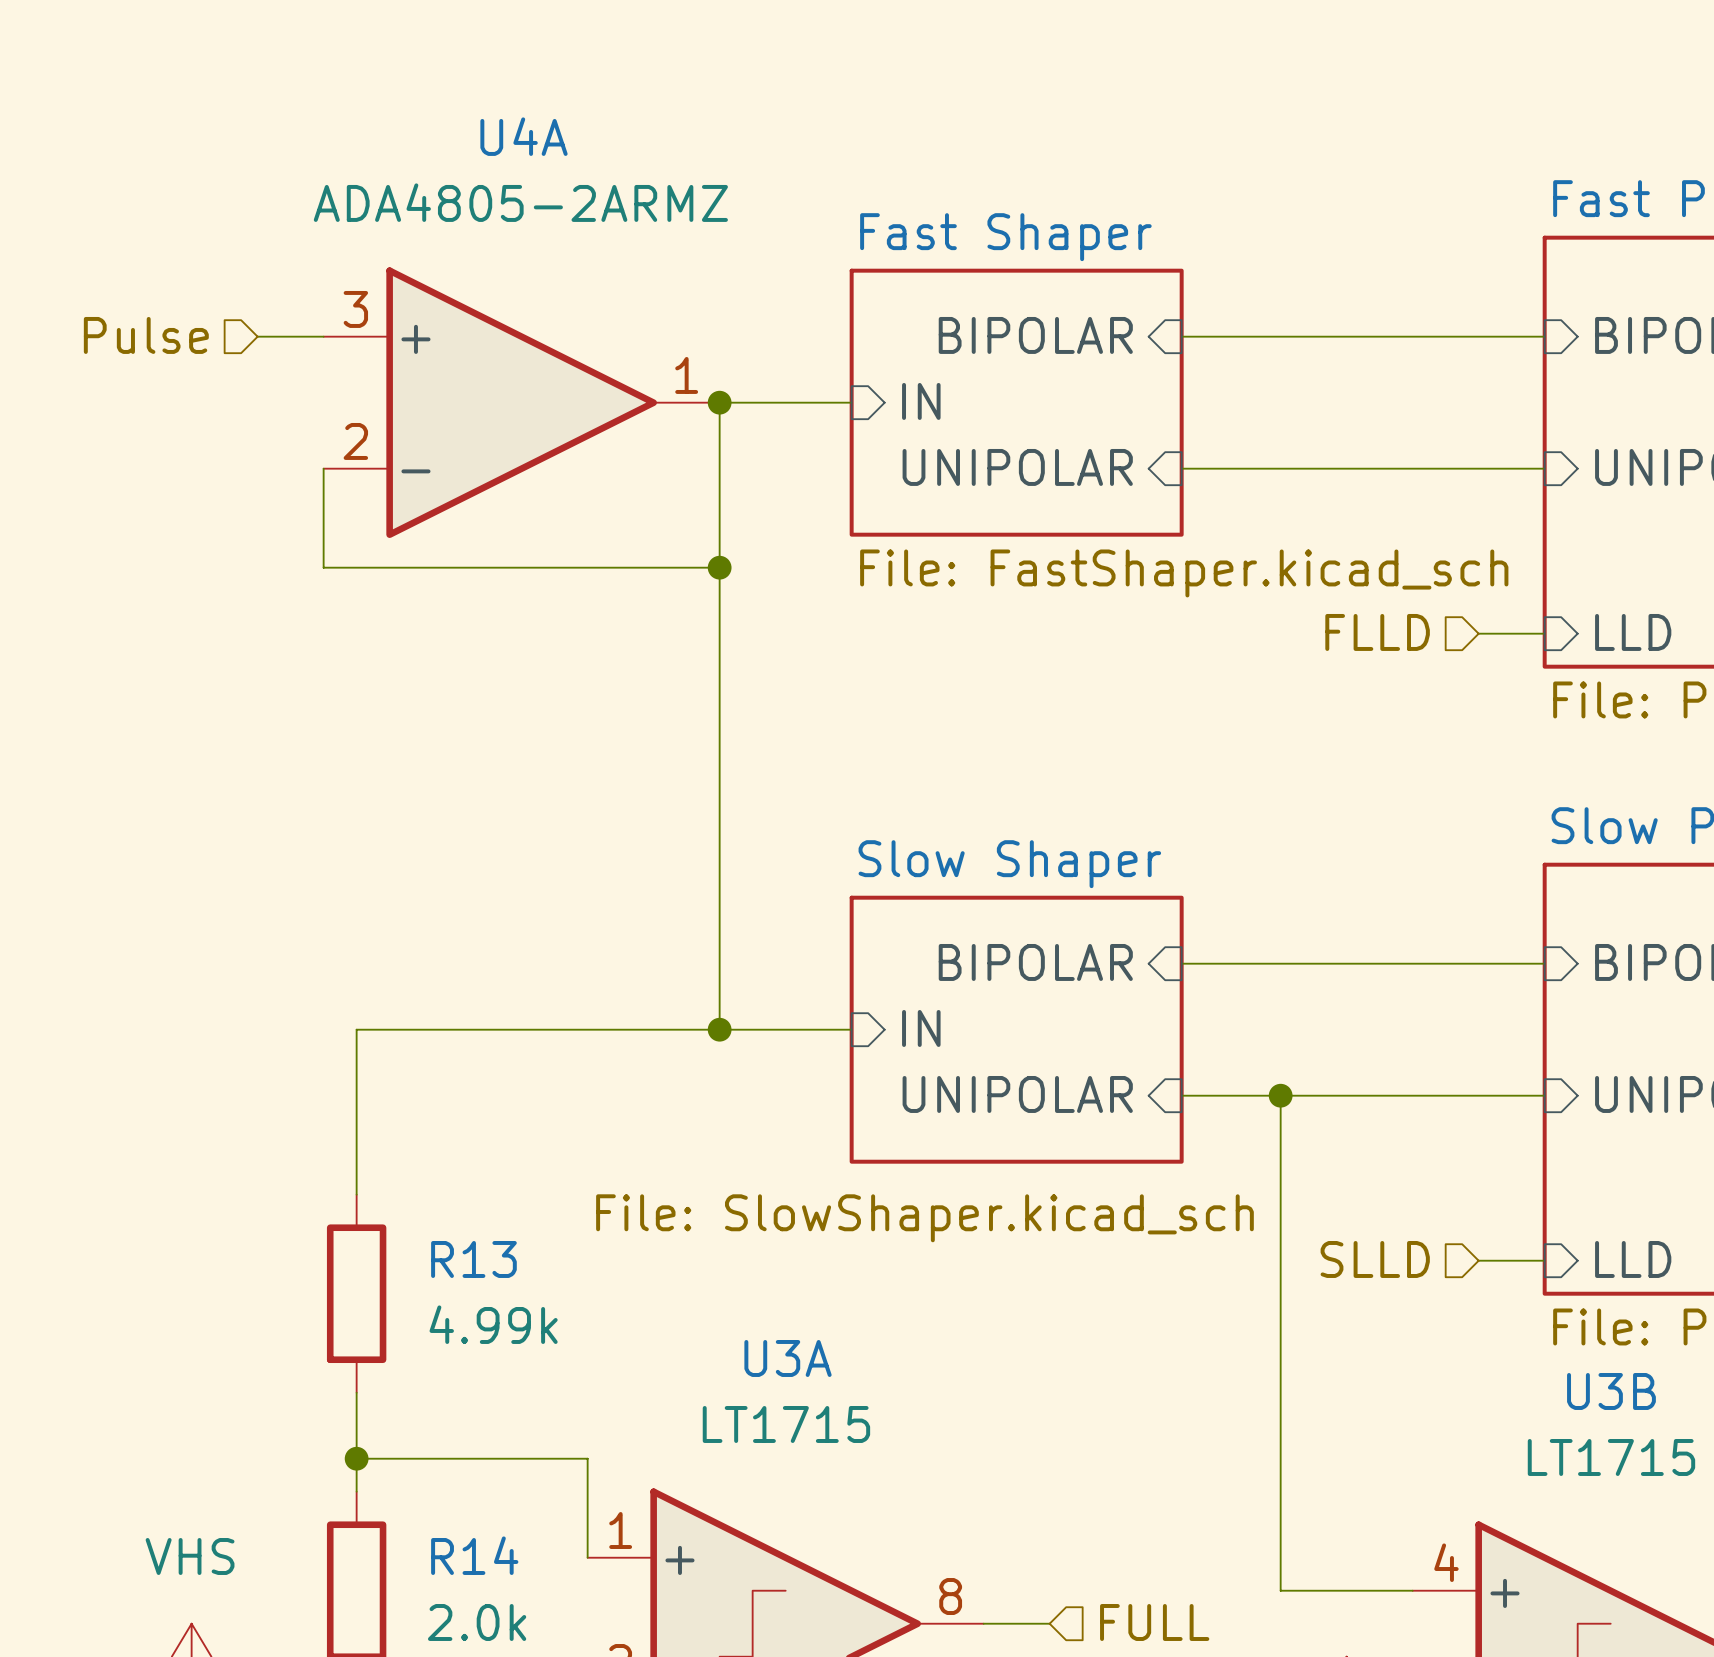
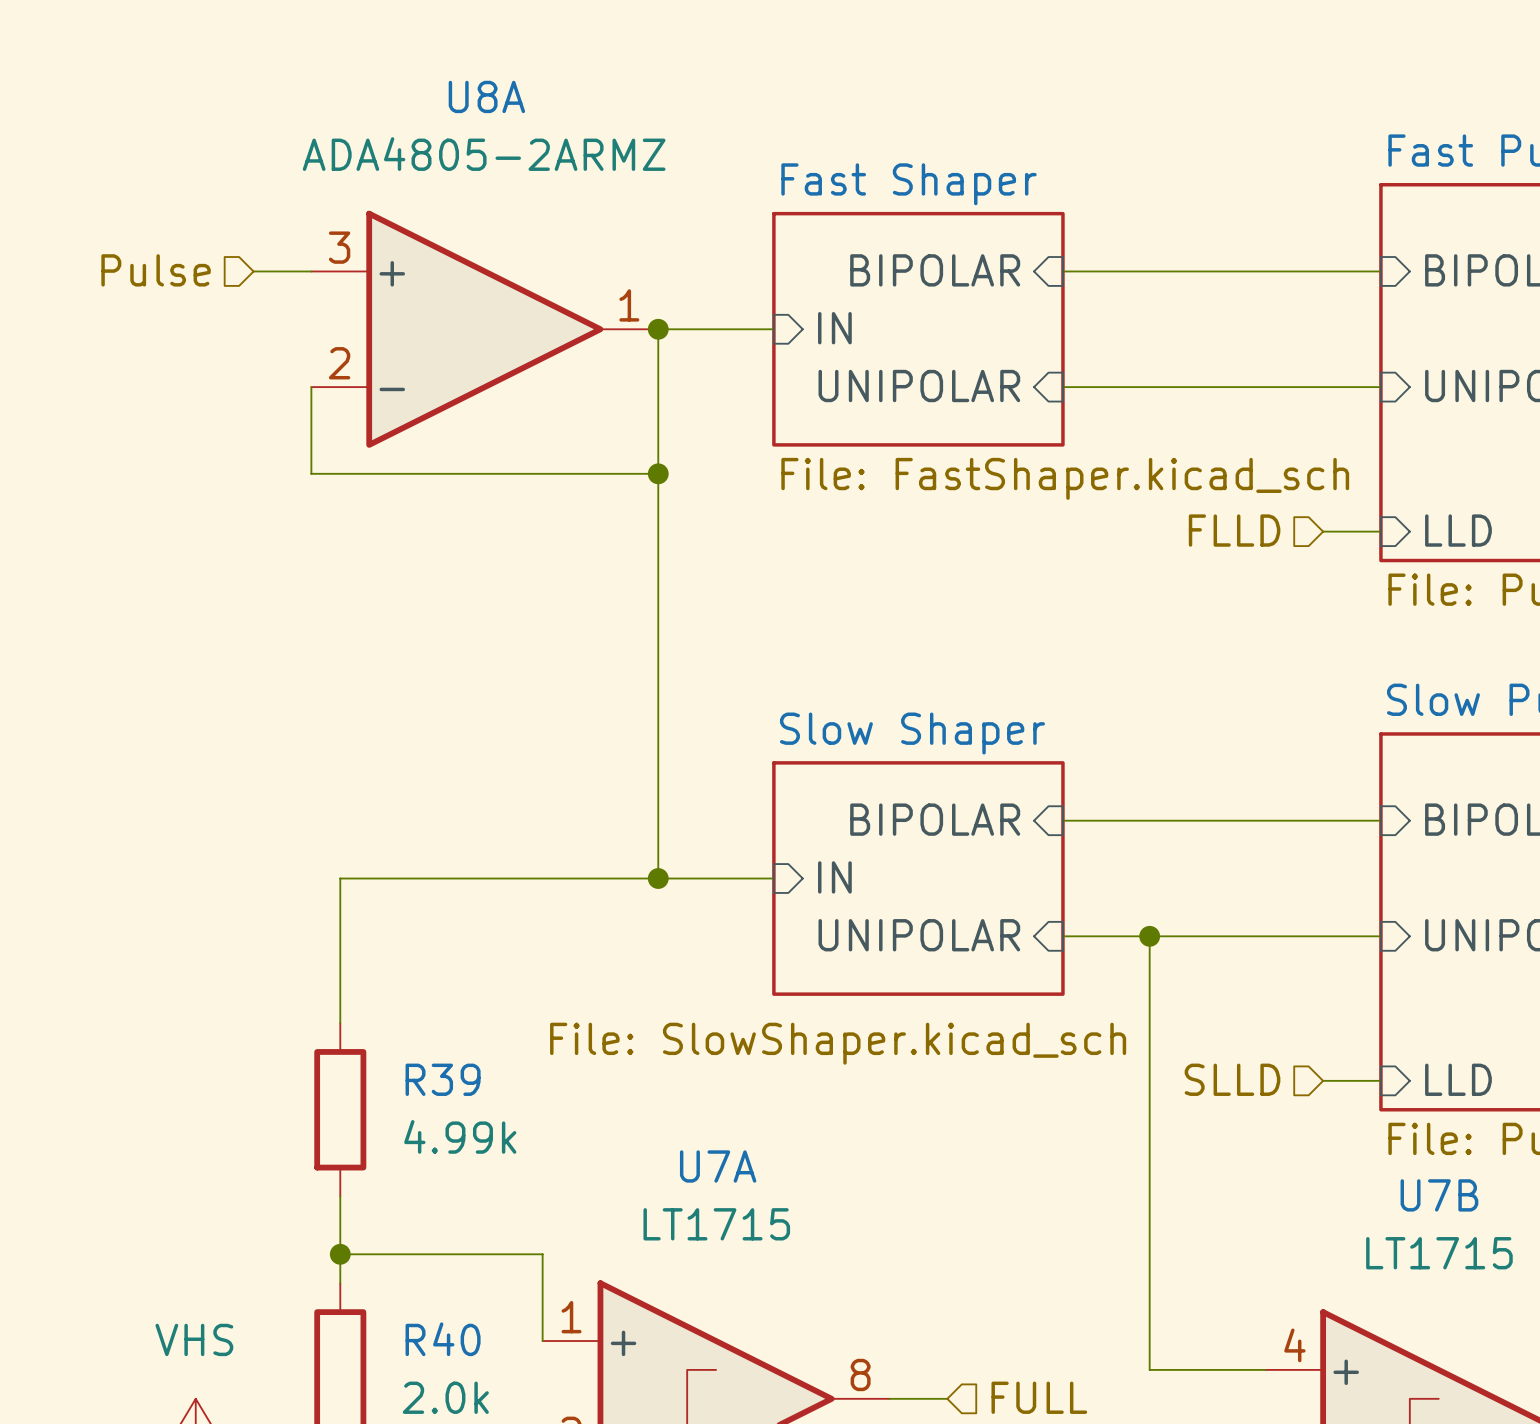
U4A name: U4A (524, 136) -> U8A (486, 96)
R13 name: R13 (473, 1259) -> R39 (443, 1079)
U3A name: U3A (788, 1358) -> U7A (718, 1166)
U3B name: U3B (1611, 1391) -> U7B (1439, 1195)
R14 name: R14 (474, 1555) -> R40 (443, 1339)

